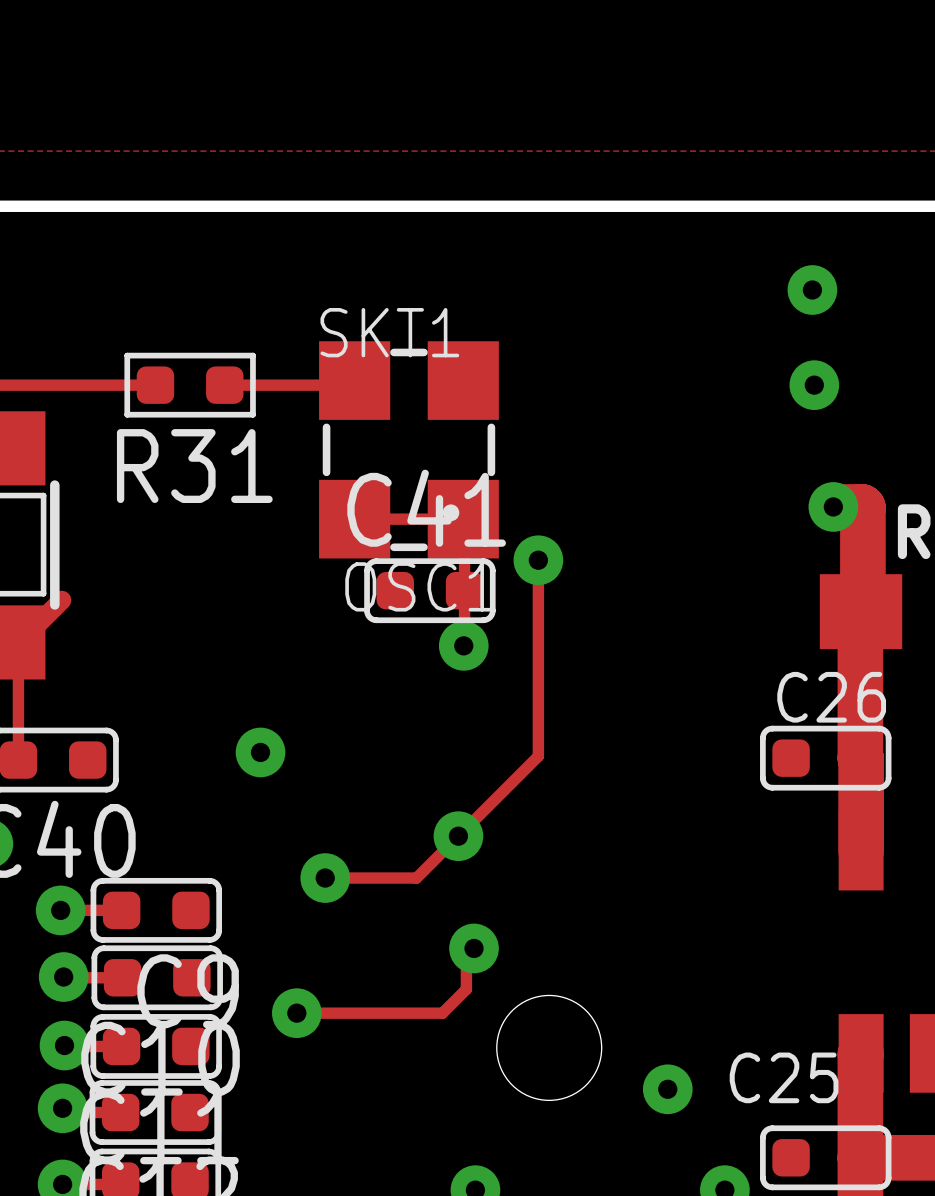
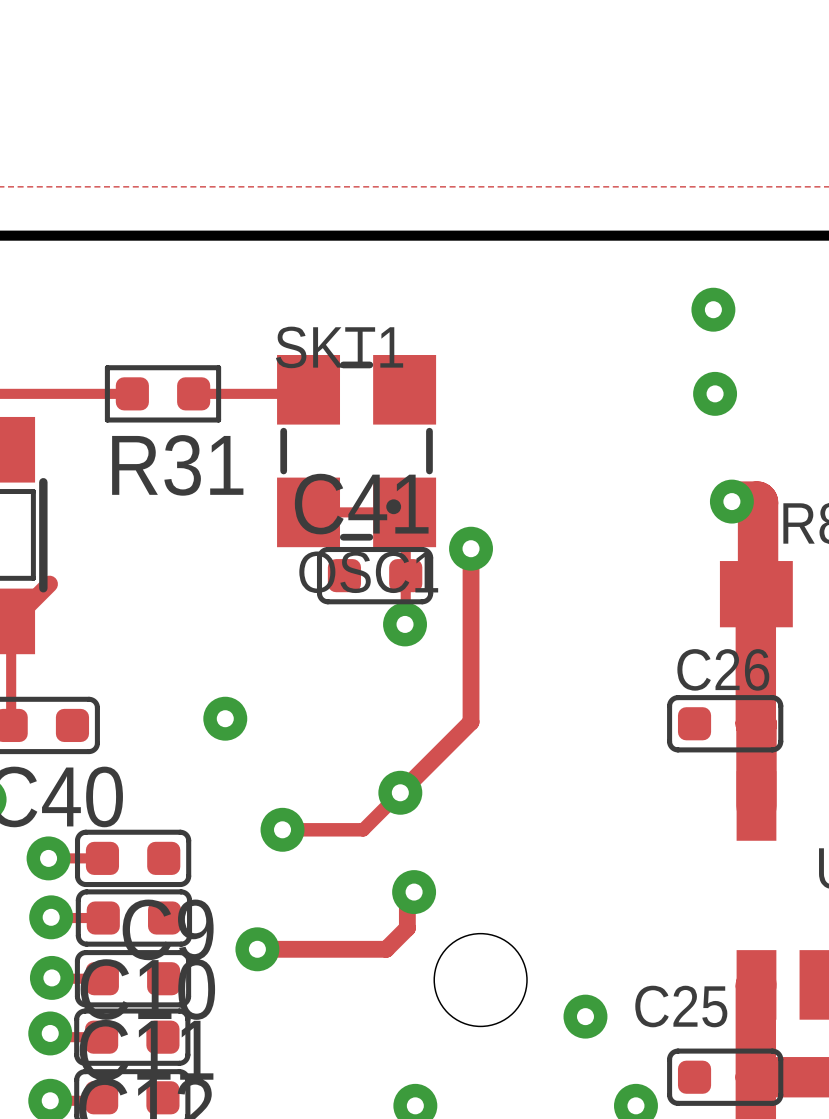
track width: thin (538, 560) (538, 756) (416, 878) (325, 878) -> thick (471, 548) (471, 722) (363, 829) (282, 829)
track width: thin (474, 948) (466, 956) (466, 989) (442, 1013) (296, 1013) -> thick (414, 892) (407, 898) (407, 928) (386, 949) (257, 949)

